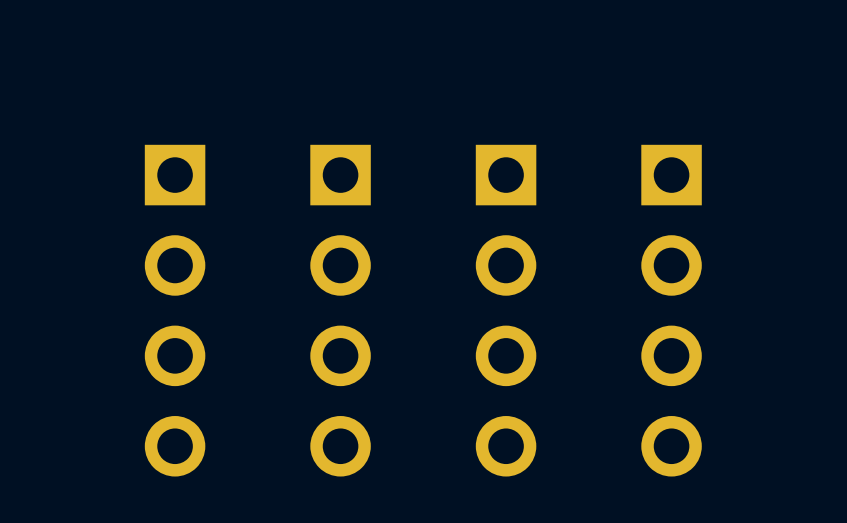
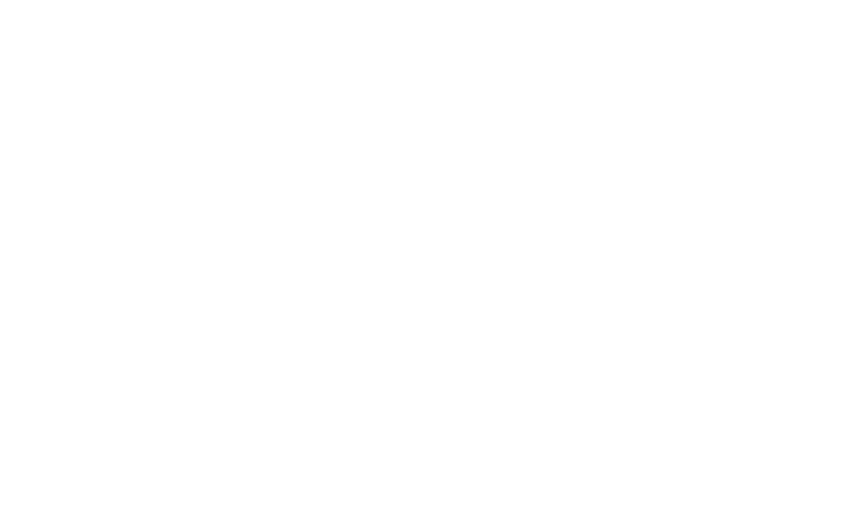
part: (175, 310) -> none
part: (340, 310) -> none
part: (506, 310) -> none
part: (671, 310) -> none

